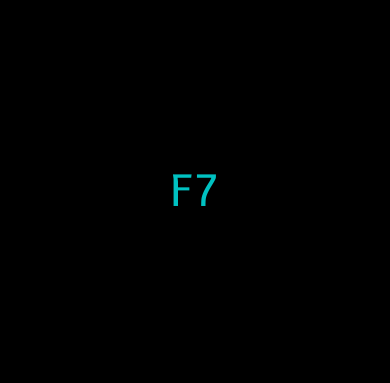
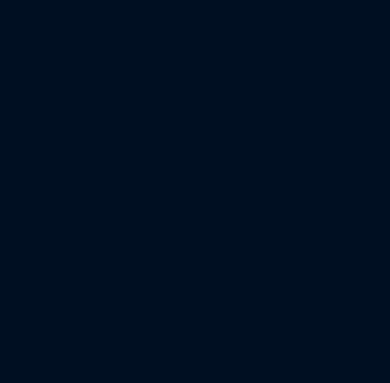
drawing: [172, 174, 216, 206] -> none

